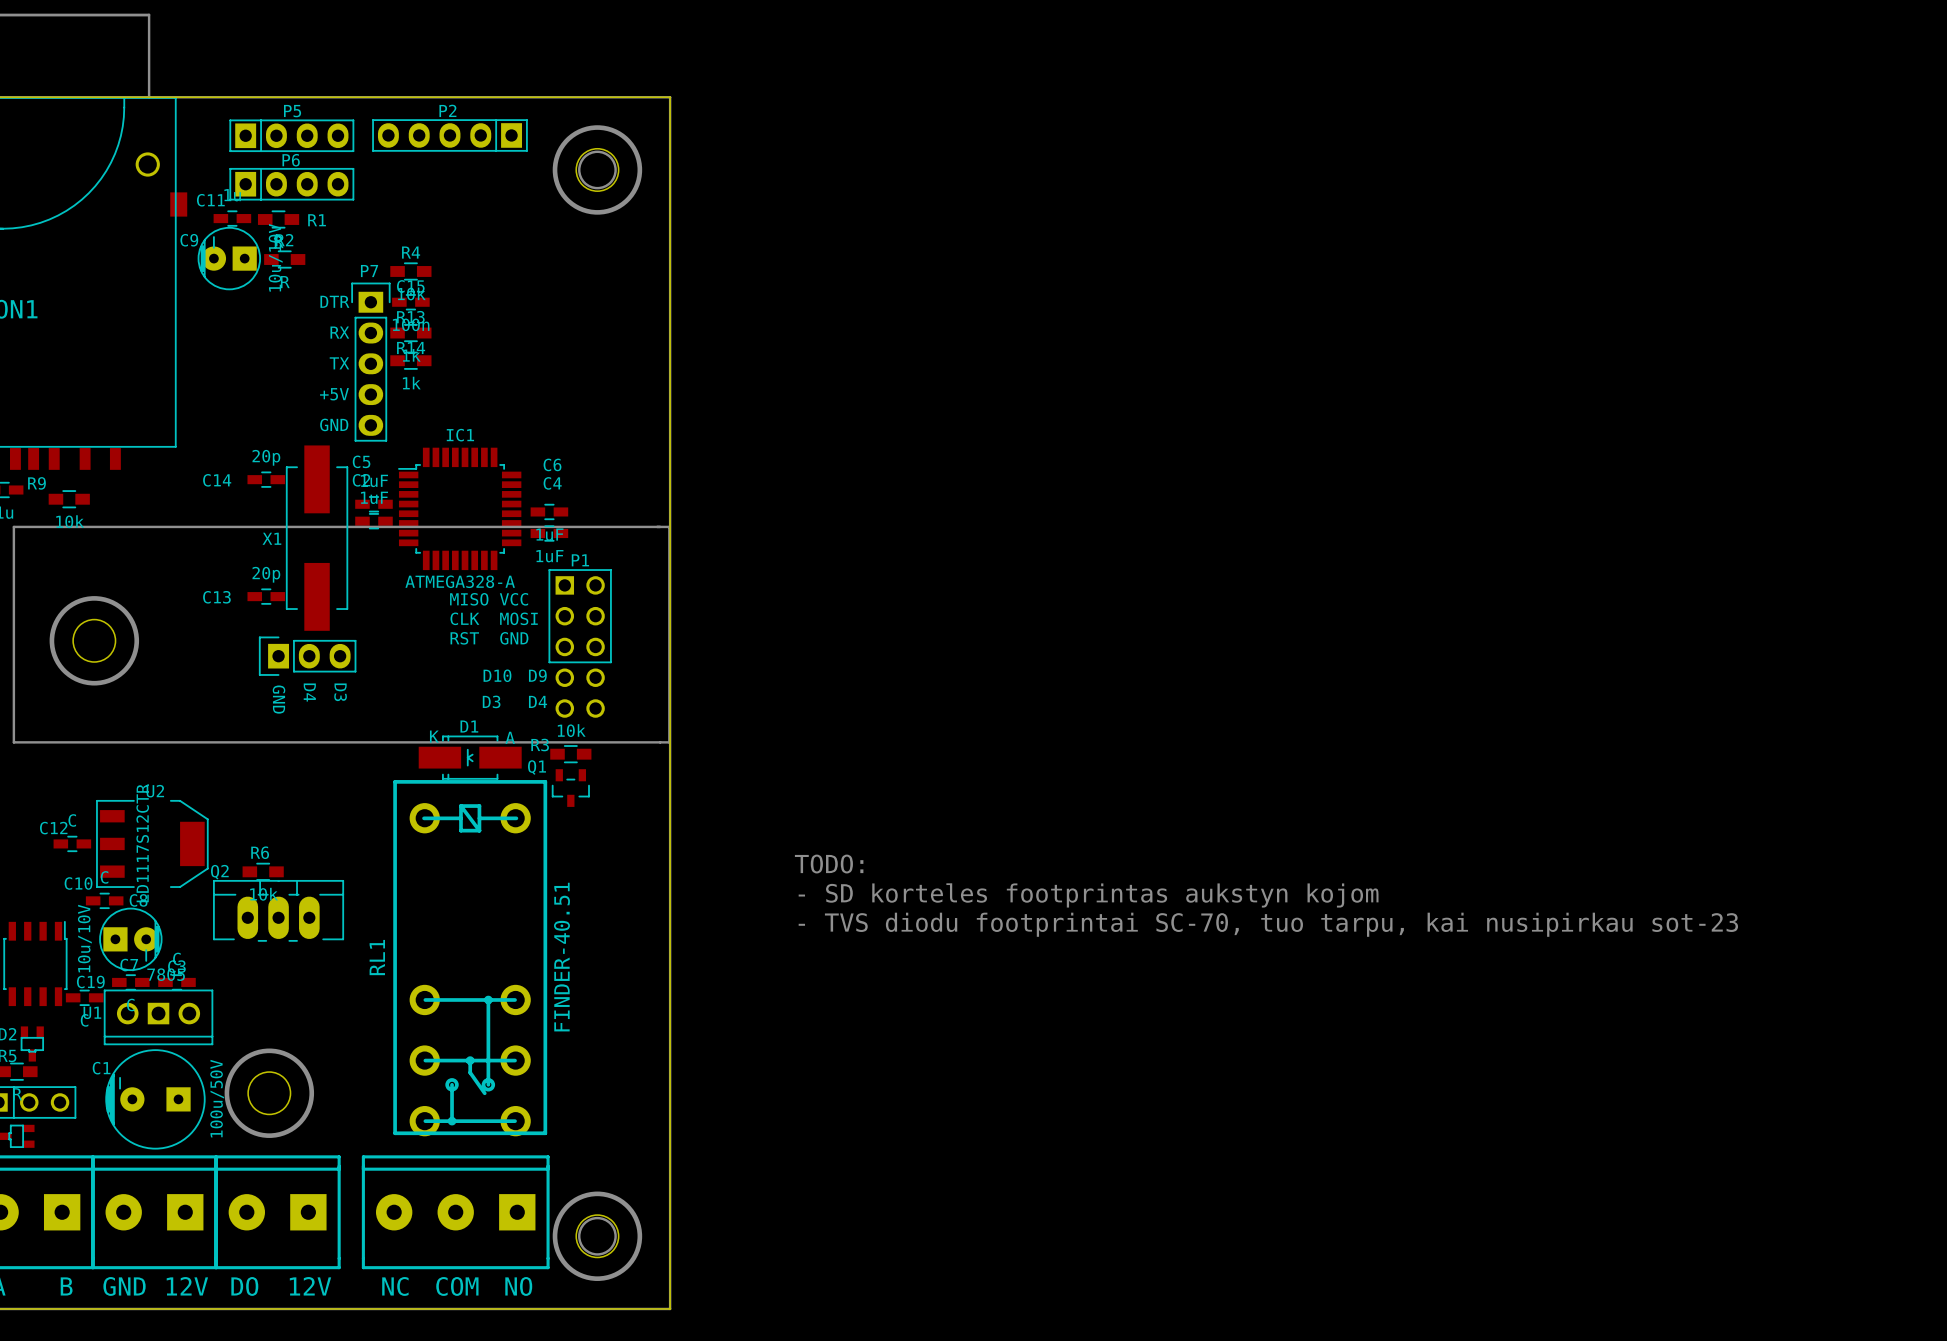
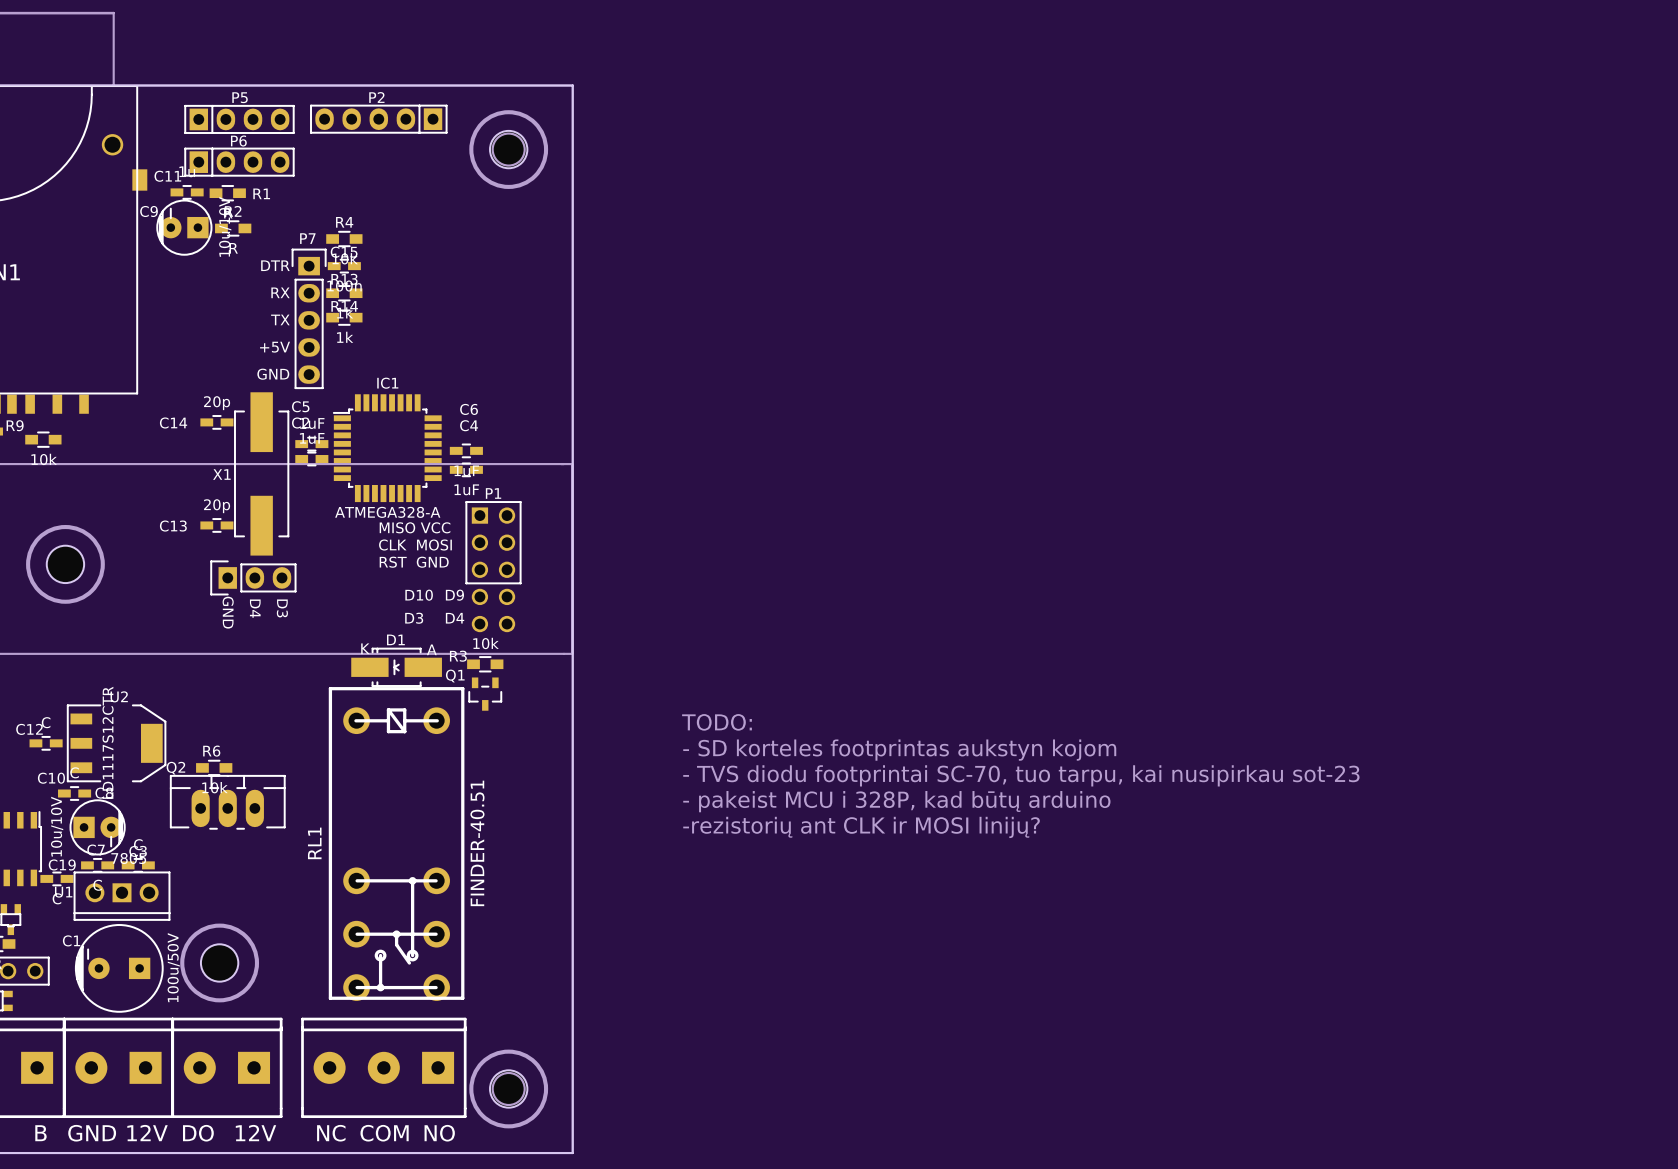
text position: TODO: (829, 864) -> TODO: (717, 722)
text position: - SD korteles footprintas aukstyn kojom (1088, 895) -> - SD korteles footprintas aukstyn kojom (899, 750)
text: none -> - pakeist MCU i 328P, kad būtų arduino (896, 801)
text position: - TVS diodu footprintai SC-70, tuo tarpu, kai nusipirkau sot-23 (1268, 924) -> - TVS diodu footprintai SC-70, tuo tarpu, kai nusipirkau sot-23 (1021, 775)
text: none -> -rezistorių ant CLK ir MOSI linijų? (861, 827)

